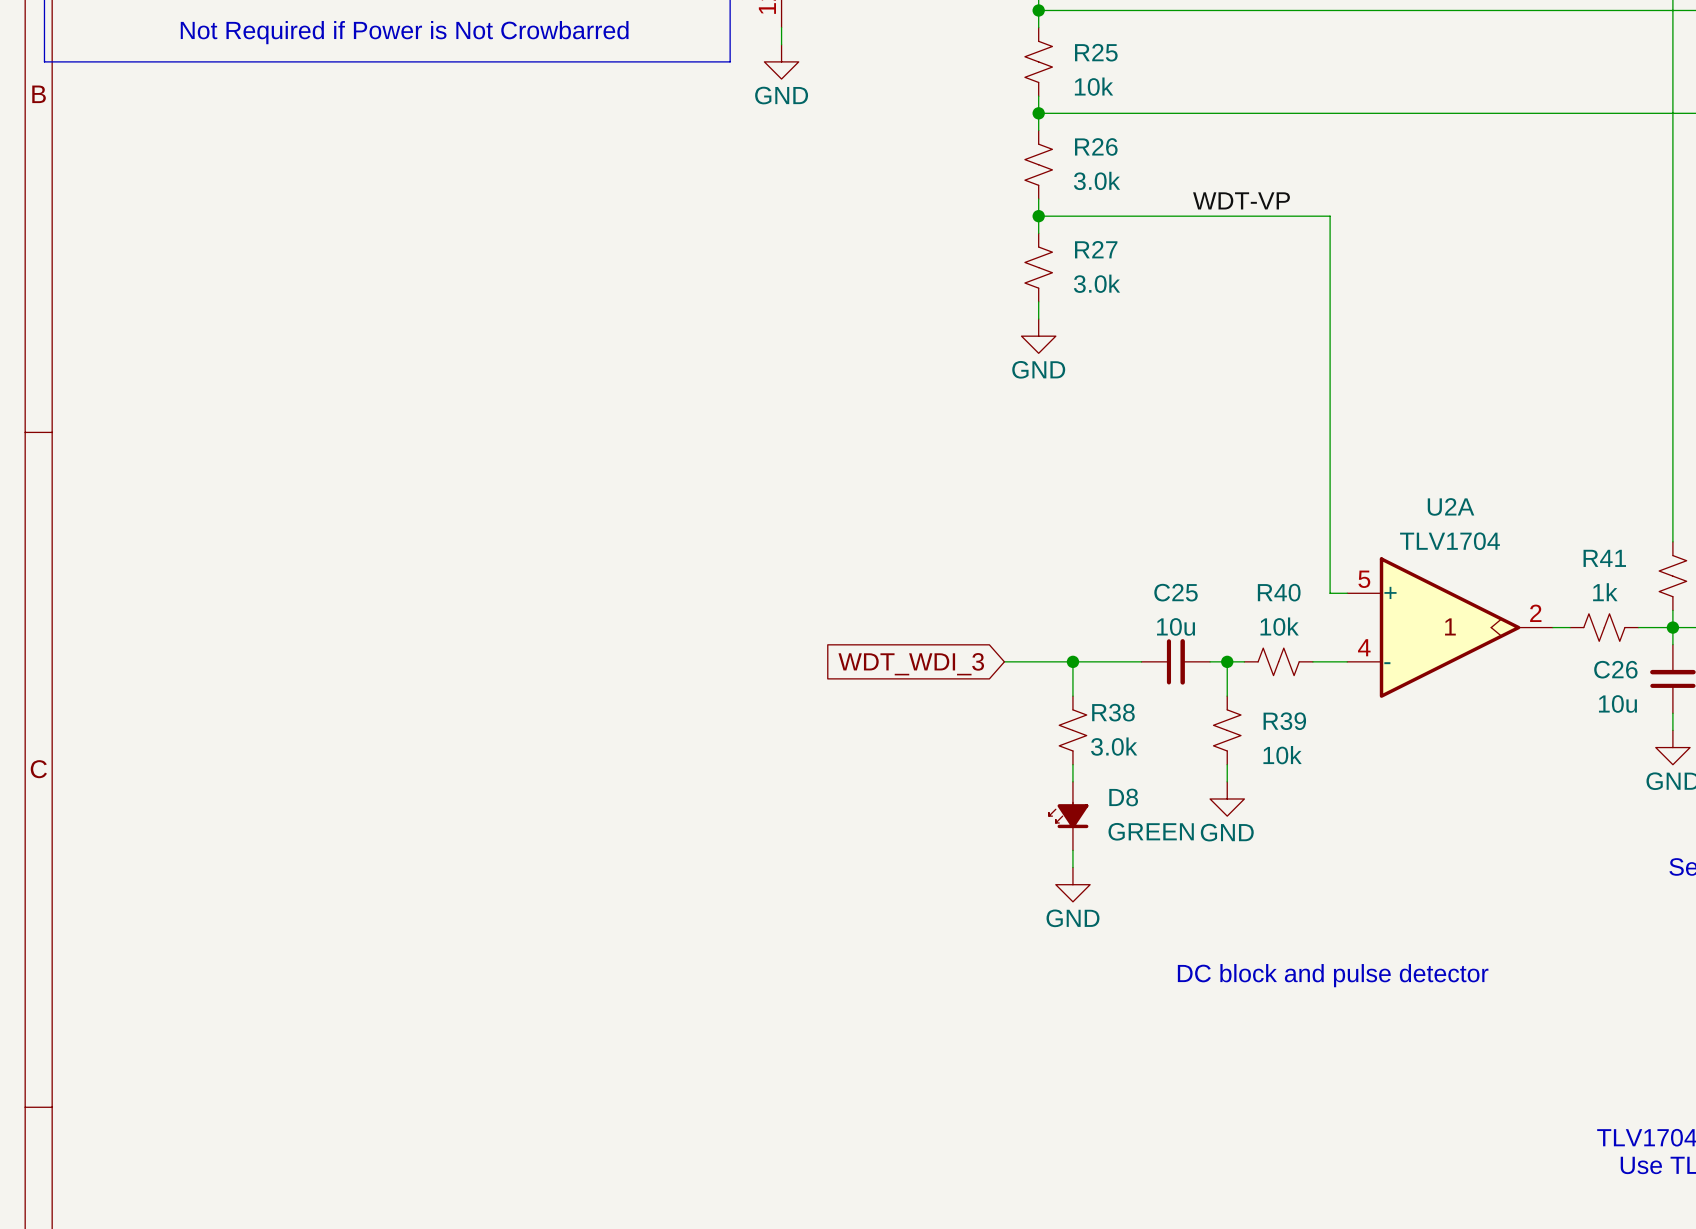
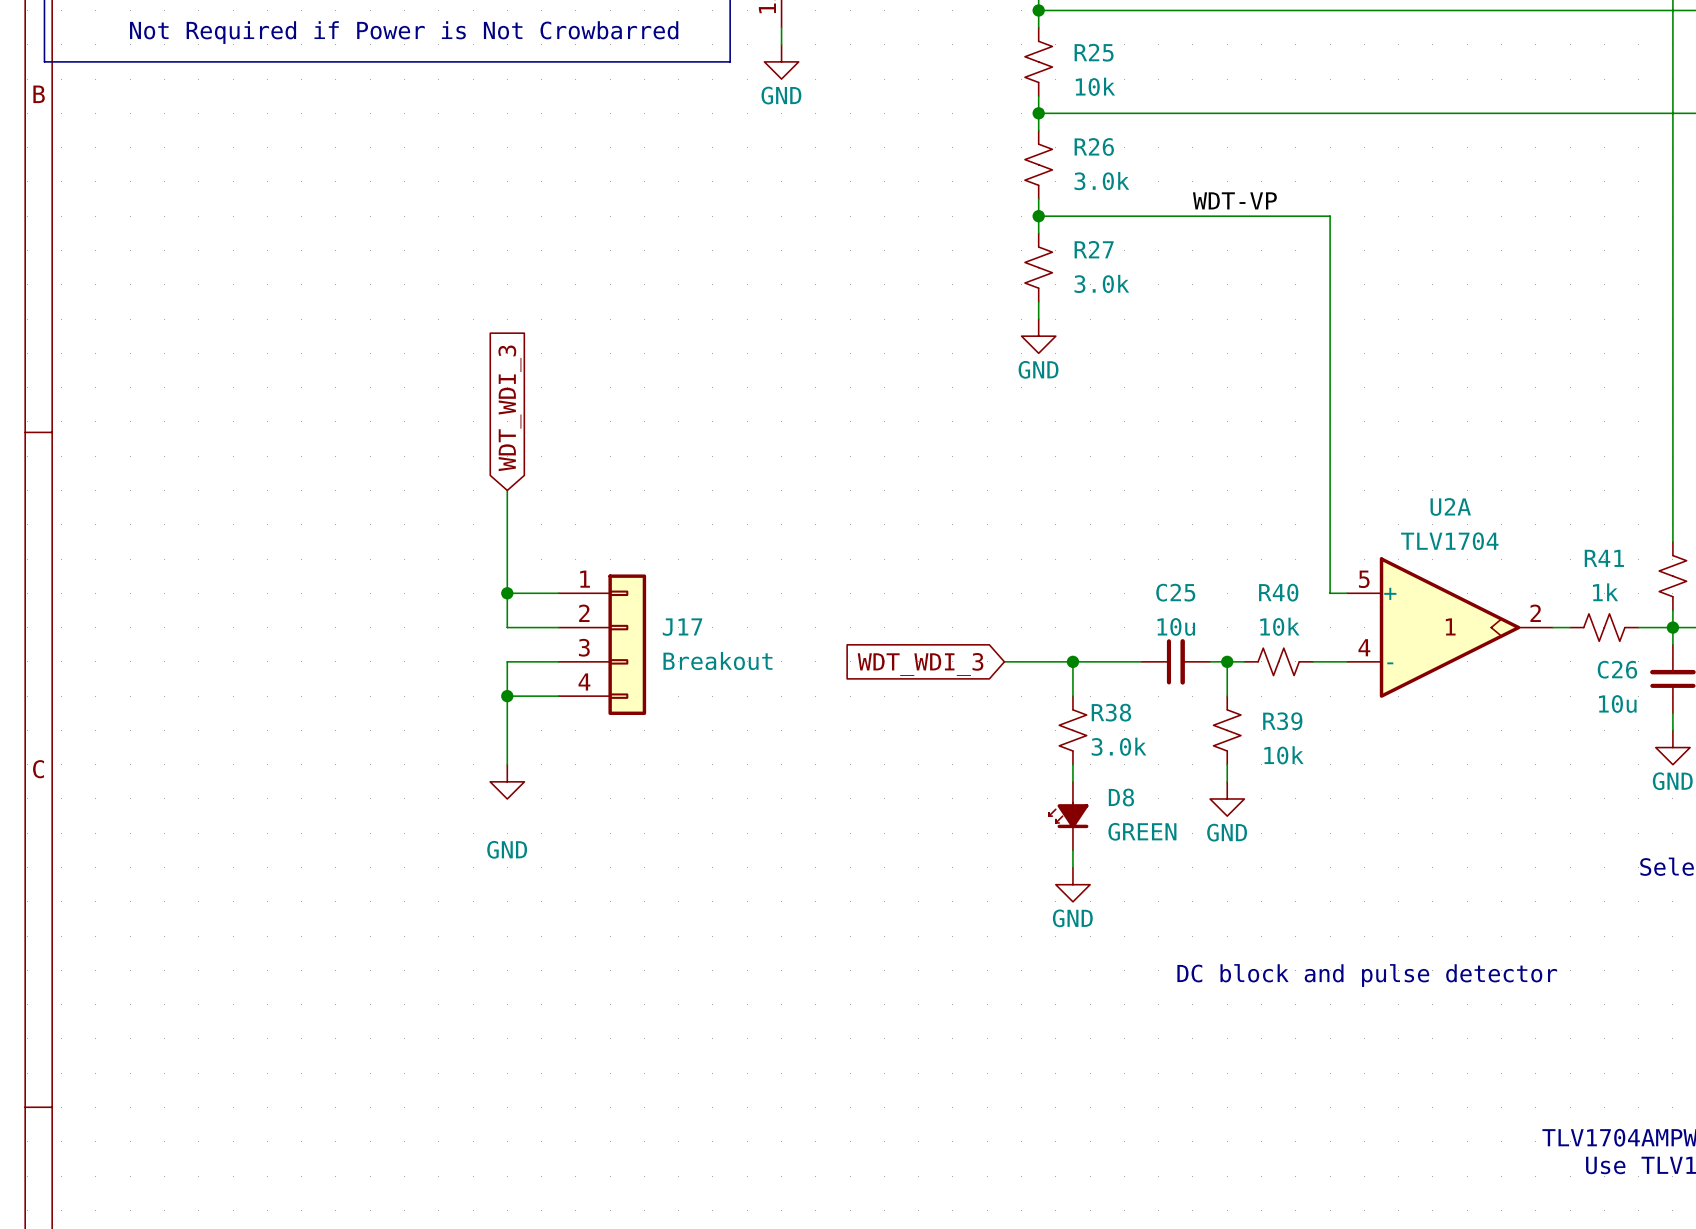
global label: none -> WDT_WDI_3 (509, 408)
wire: none -> (507, 490) (507, 627) (558, 627)
wire: none -> (507, 593) (558, 593)
junction: none -> (507, 593)
J17: none -> Breakout (602, 644)
wire: none -> (558, 661) (507, 661) (507, 764)
wire: none -> (507, 696) (558, 696)
junction: none -> (507, 696)
power symbol: none -> GND (507, 781)

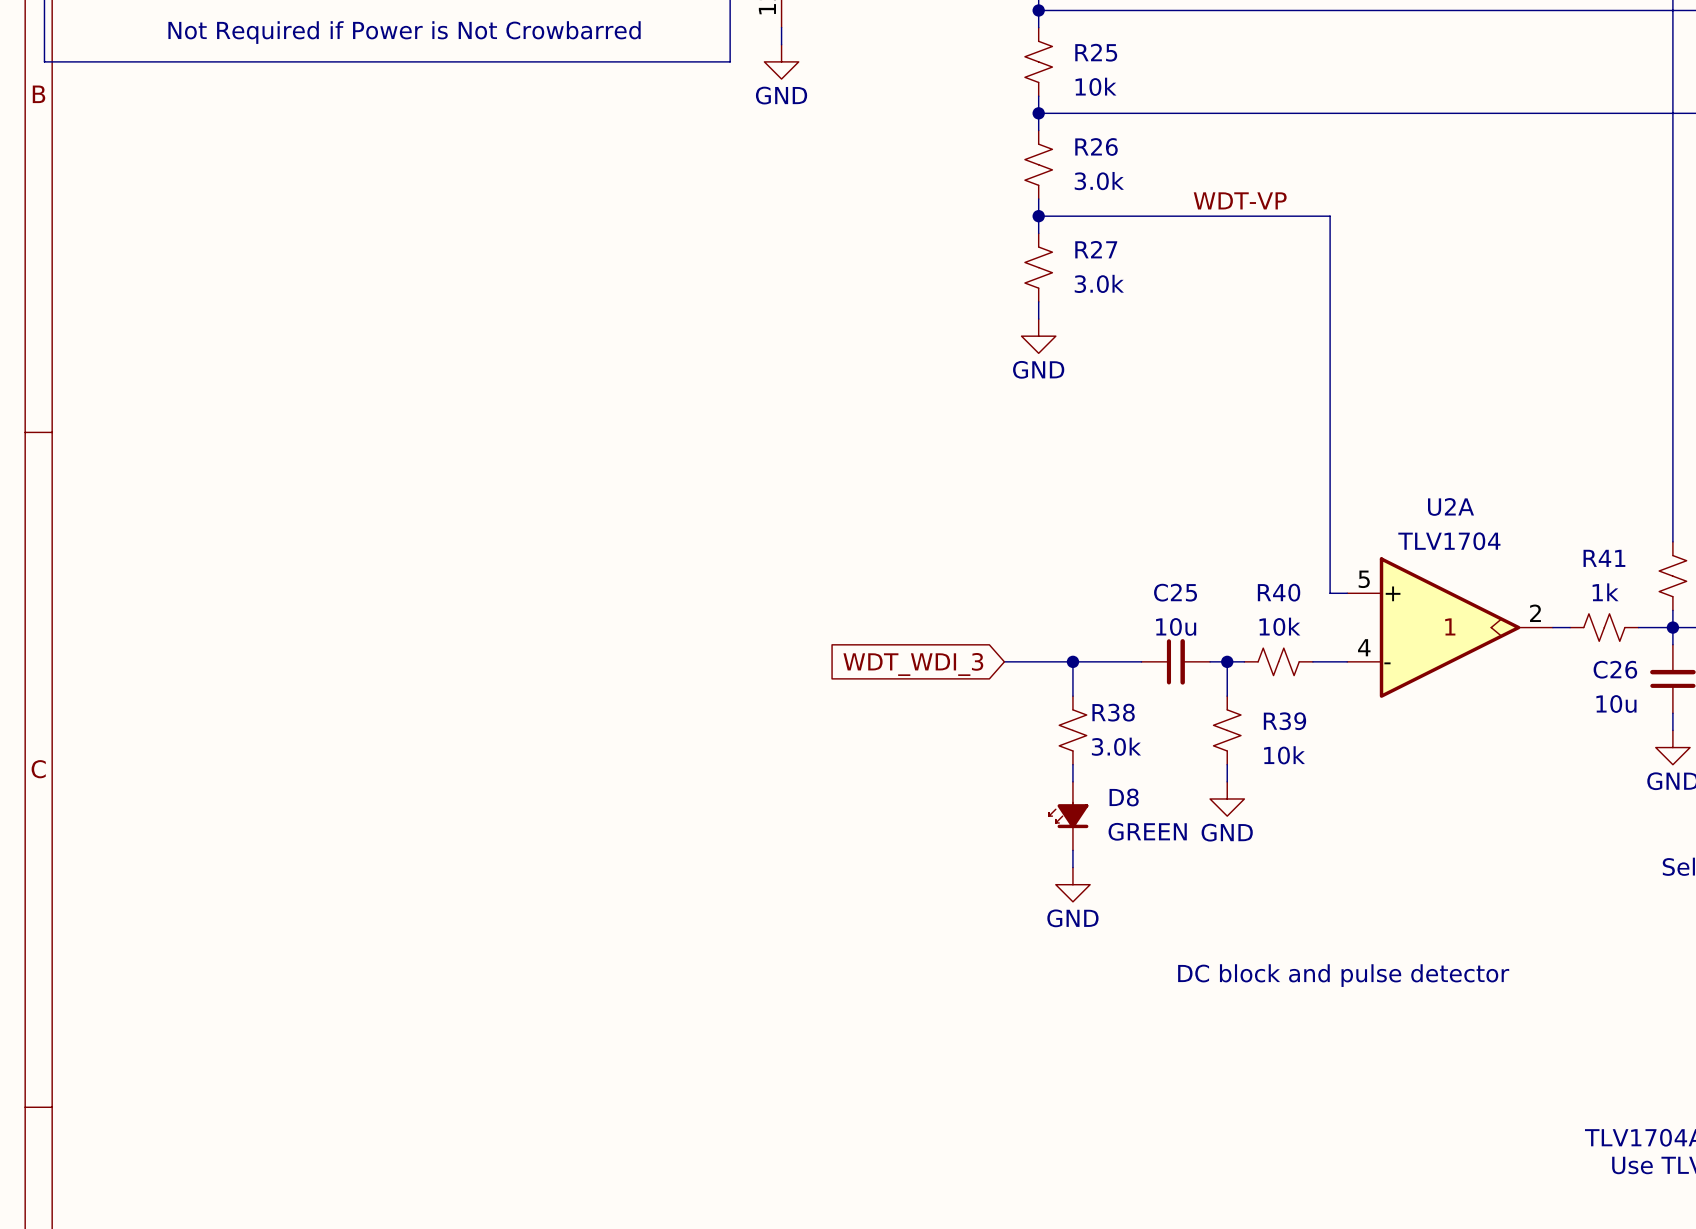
global label: WDT_WDI_3 (509, 408) -> none
wire: (507, 490) (507, 627) (558, 627) -> none
wire: (507, 593) (558, 593) -> none
junction: (507, 593) -> none
J17: Breakout (602, 644) -> none
wire: (558, 661) (507, 661) (507, 764) -> none
wire: (507, 696) (558, 696) -> none
junction: (507, 696) -> none
power symbol: GND (507, 781) -> none

